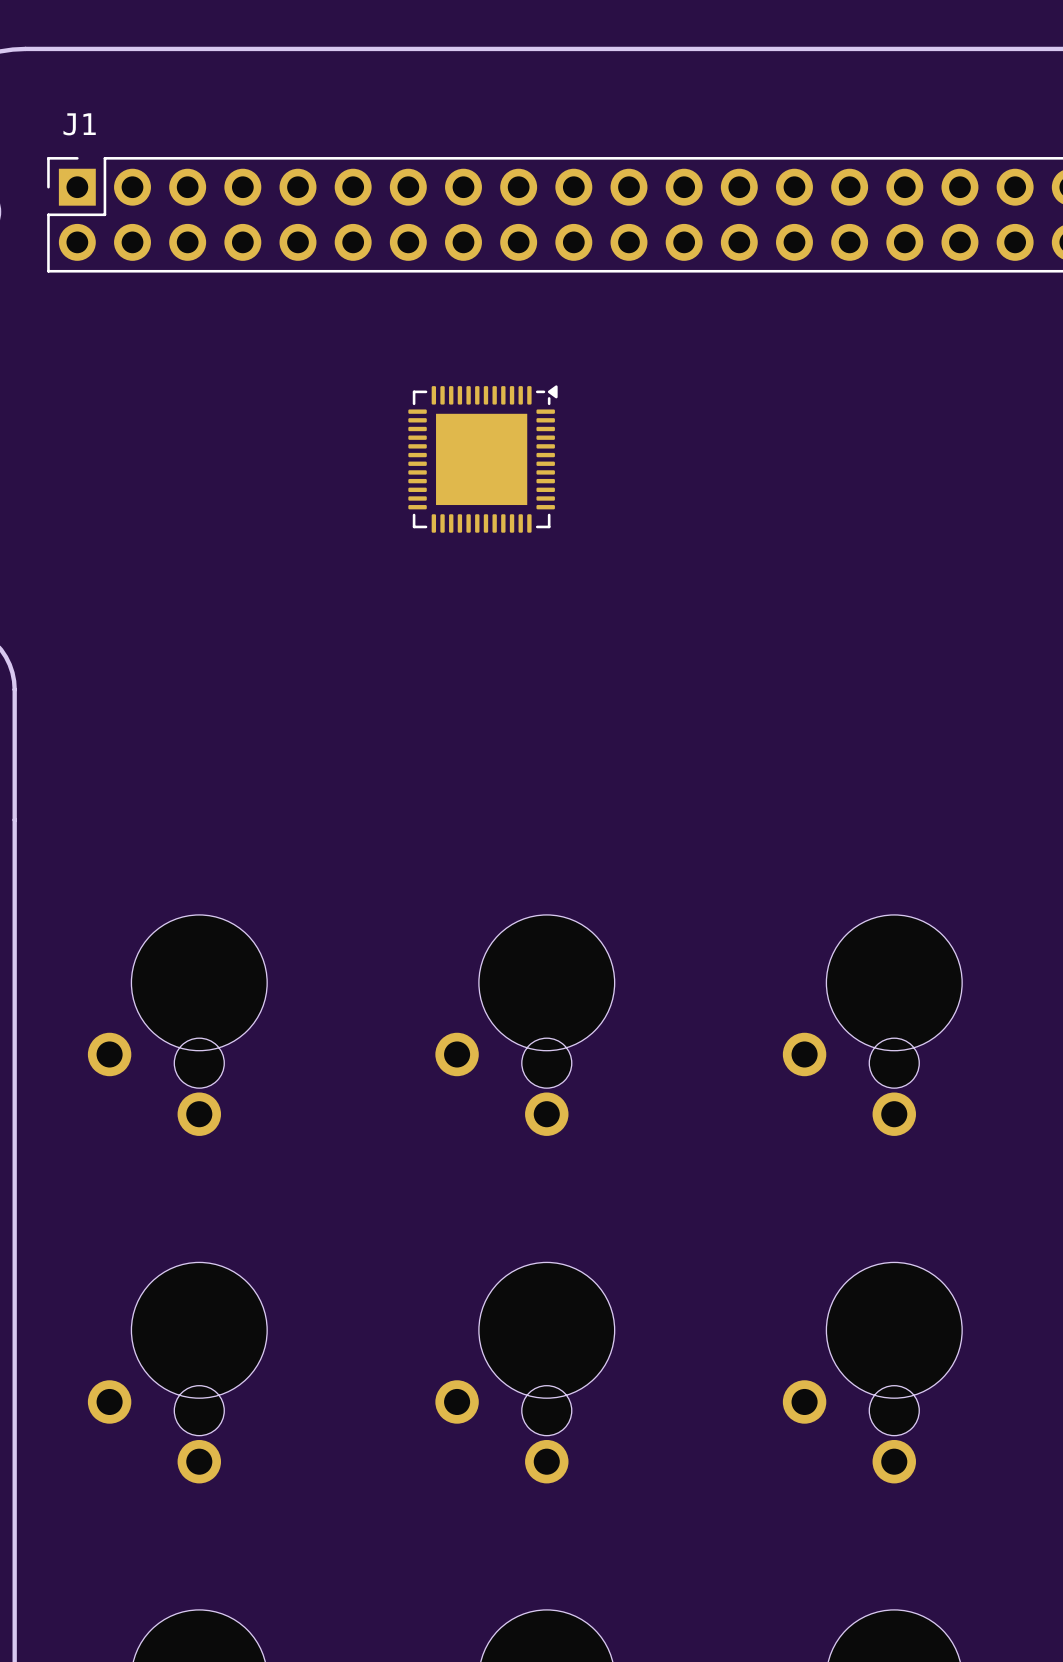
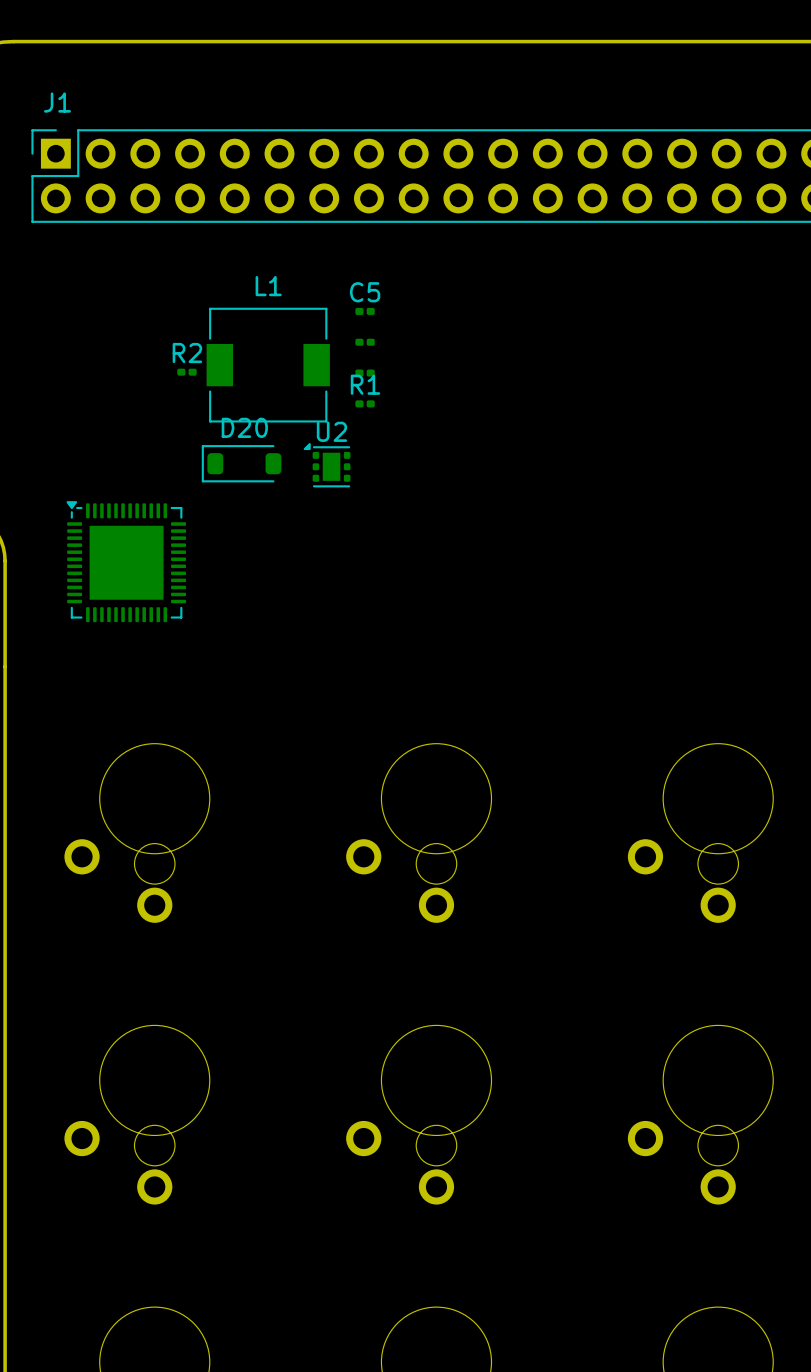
C5: none -> (365, 311)
part: none -> (365, 342)
L1: none -> (268, 365)
R2: none -> (186, 372)
part: none -> (365, 373)
part rotation: 0° (482, 459) -> 90° counterclockwise (126, 561)
part position: (482, 459) -> (126, 561)
R1: none -> (365, 403)
D20: none -> (241, 463)
U2: none -> (327, 465)

